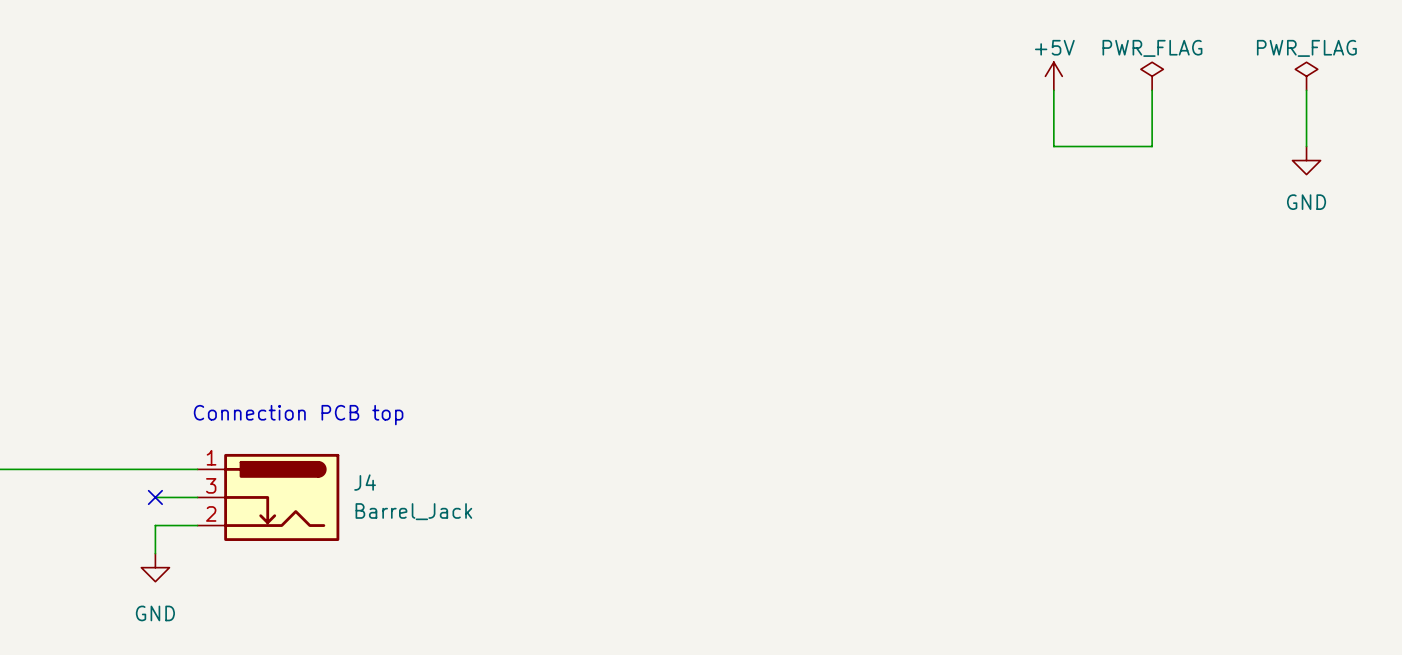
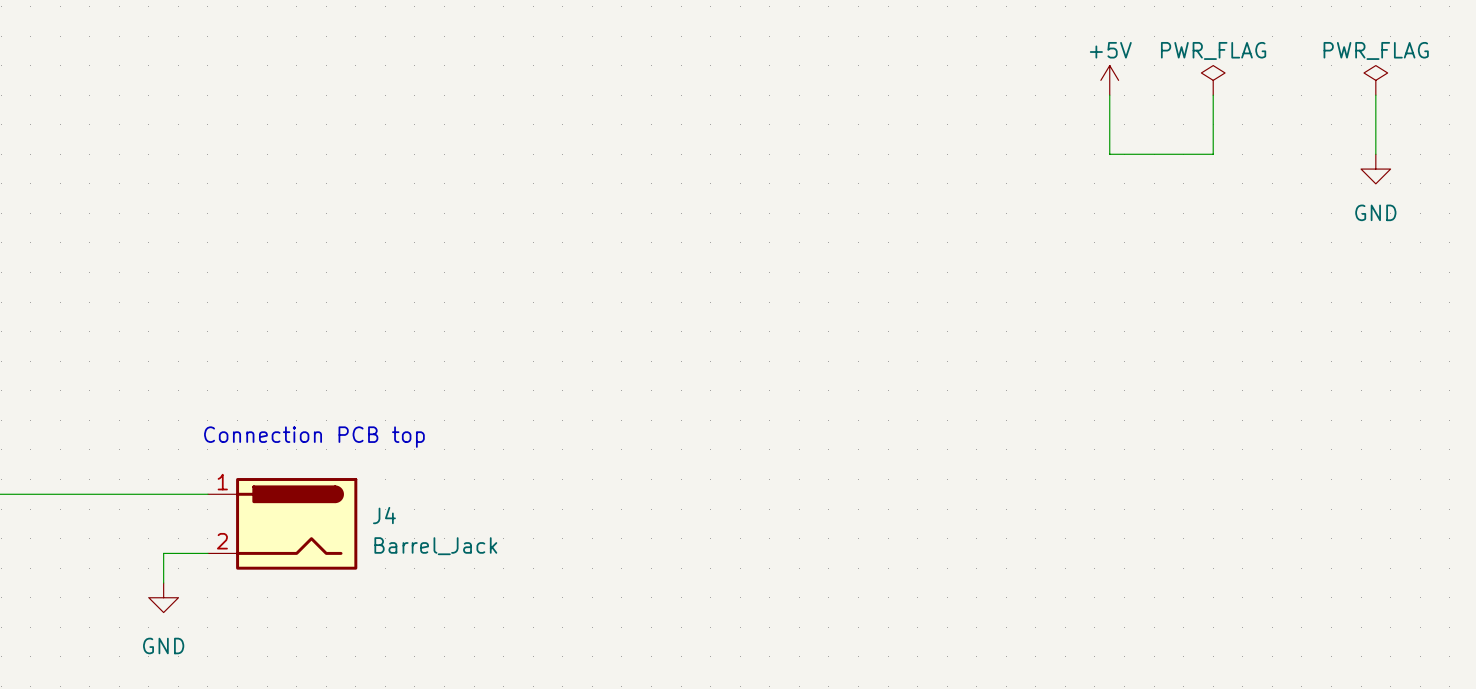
J4 symbol: [197, 453, 340, 541] -> [207, 478, 358, 570]
wire: (155, 497) (197, 497) -> none
no-connect mark: (155, 497) -> none

